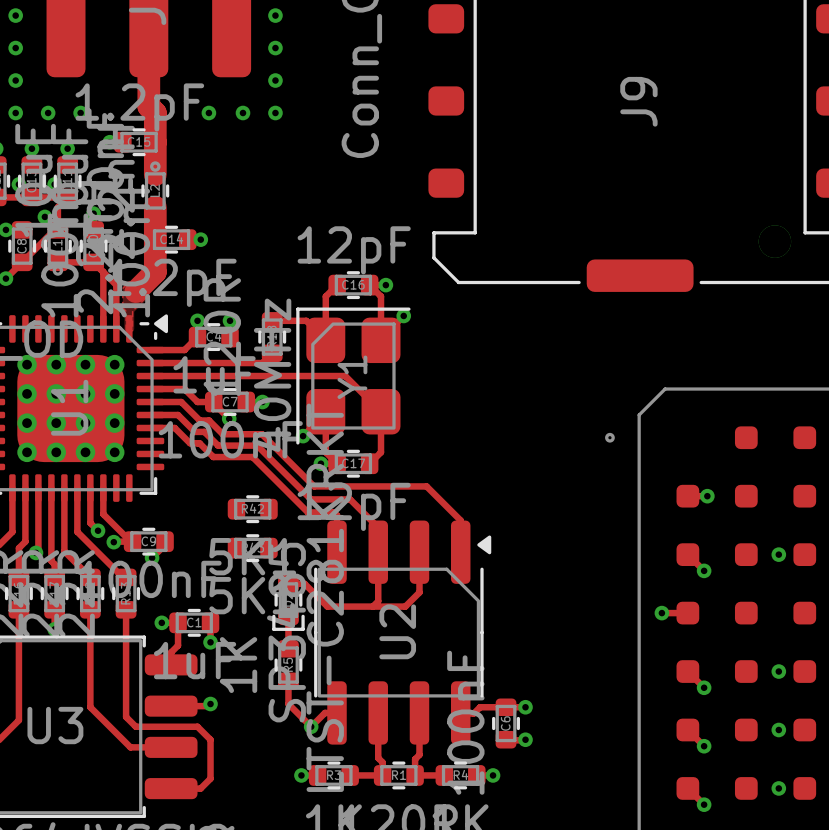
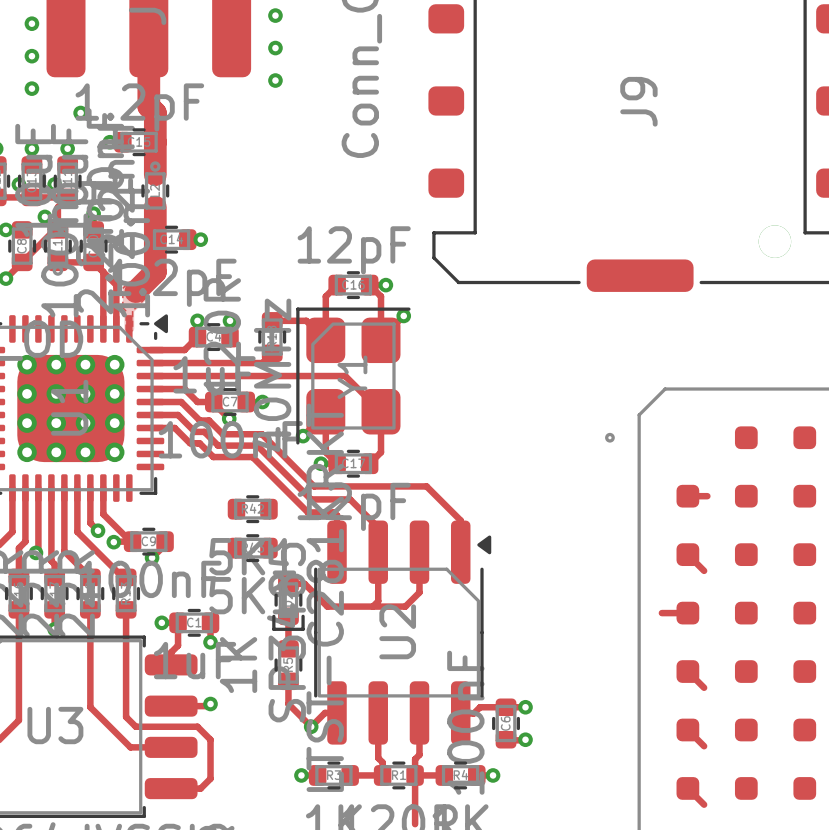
via: (15, 15) -> none
via: none -> (31, 23)
via: (15, 48) -> none
via: none -> (31, 56)
via: (15, 80) -> none
via: none -> (31, 88)
via: (15, 113) -> none
via: (48, 113) -> none
via: (208, 113) -> none
via: (242, 113) -> none
via: (275, 113) -> none
via: (707, 496) -> none
via: (778, 554) -> none
via: (704, 570) -> none
via: (661, 613) -> none
via: (778, 671) -> none
via: (704, 687) -> none
via: (778, 729) -> none
via: (704, 746) -> none
track: none -> (415, 775) (415, 824)
via: (778, 788) -> none
via: (704, 804) -> none

